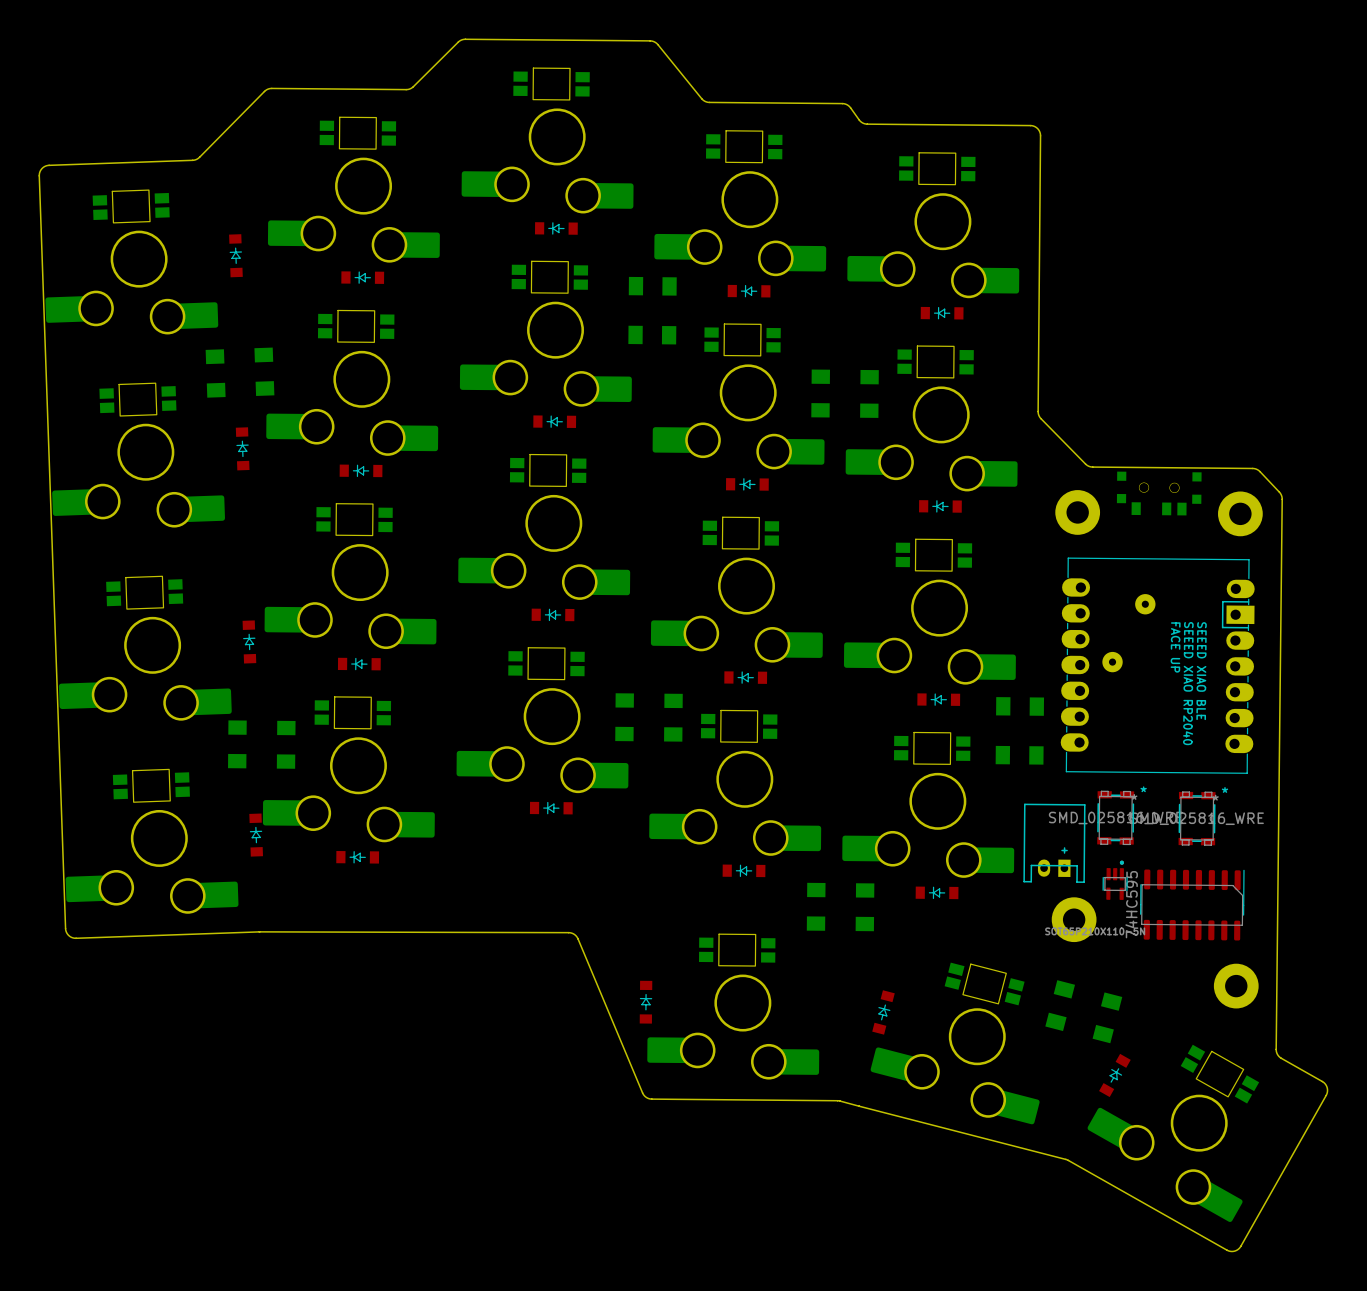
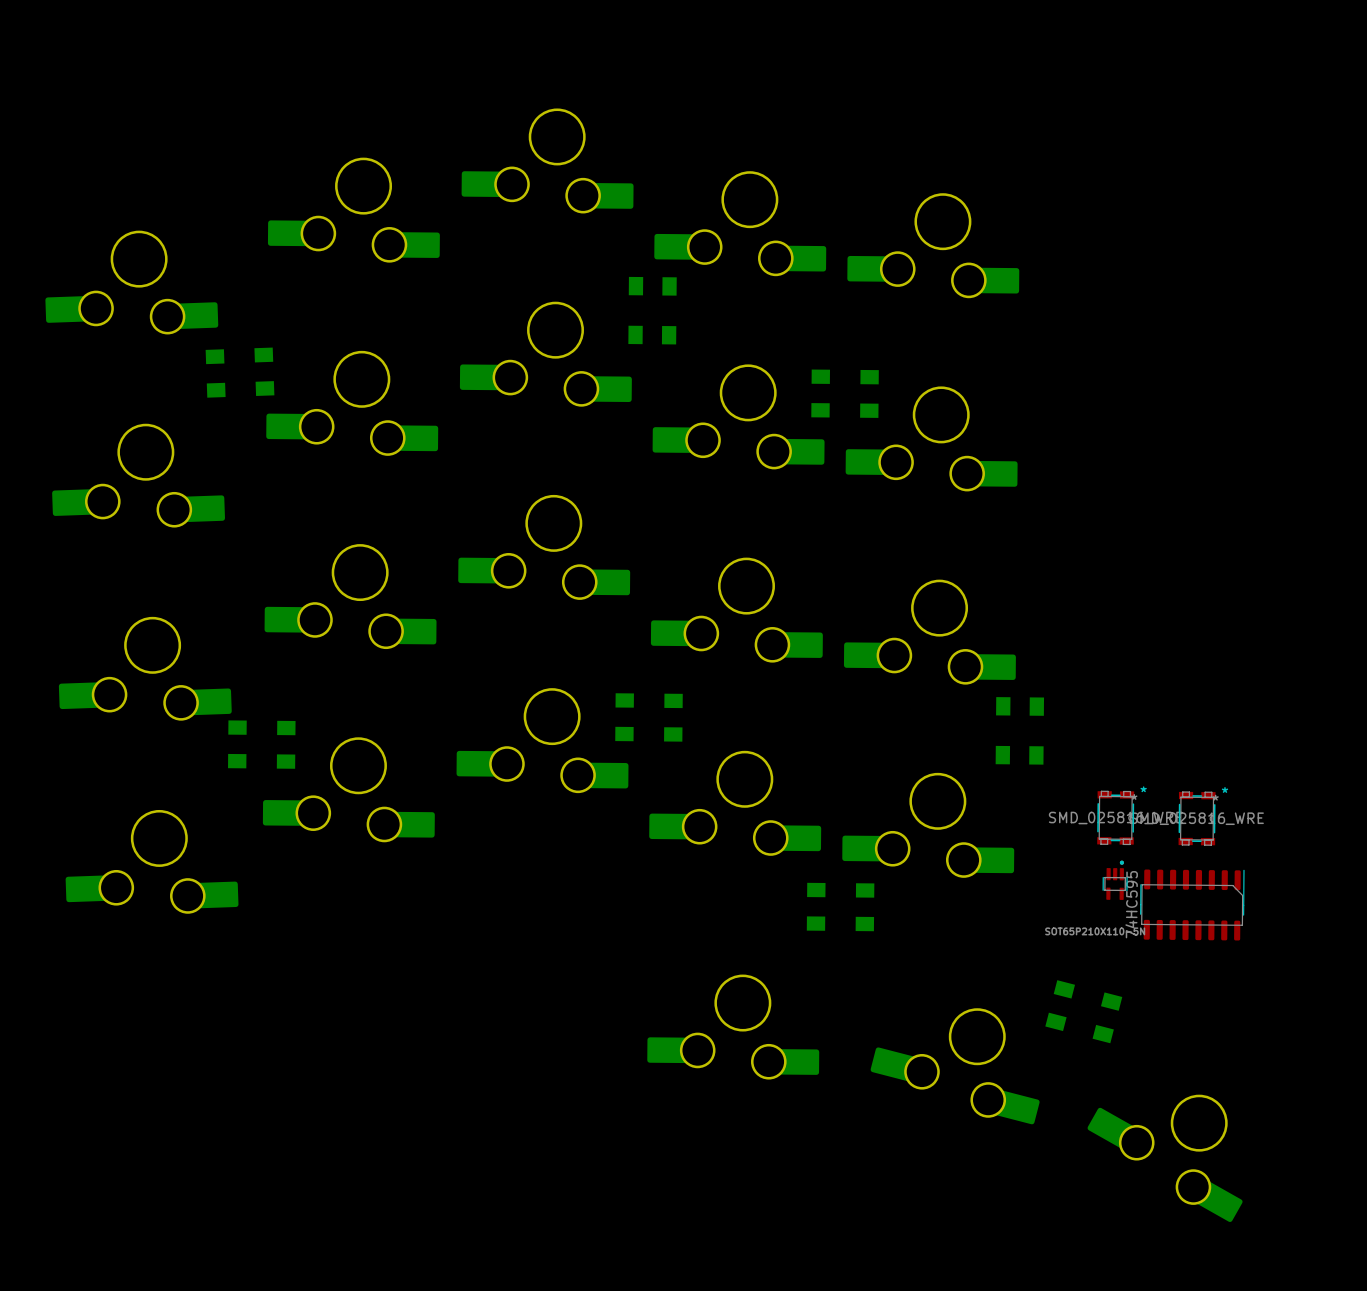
board edge: (465, 39) (651, 40) (657, 43) (701, 98) (707, 102) (843, 103) (849, 106) (860, 121) (866, 124) (1034, 126) (1039, 130) (1040, 135) (1038, 411) (1040, 417) (1089, 466) (1253, 468) (1259, 470) (1280, 493) (1282, 499) (1276, 1050) (1280, 1057) (1323, 1082) (1327, 1091) (1237, 1249) (1232, 1251) (1226, 1250) (1067, 1159) (840, 1101) (647, 1097) (642, 1092) (578, 938) (571, 932) (259, 931) (76, 938) (67, 933) (39, 171) (44, 166) (49, 165) (195, 159) (267, 89) (409, 89) (458, 41) (465, 39) -> none
part: (551, 84) -> none
part: (357, 133) -> none
part: (744, 146) -> none
part: (937, 168) -> none
part: (131, 206) -> none
part: (556, 228) -> none
part: (235, 255) -> none
part: (362, 277) -> none
part: (549, 277) -> none
part: (749, 291) -> none
part: (942, 313) -> none
part: (356, 326) -> none
part: (742, 339) -> none
part: (935, 361) -> none
part: (137, 399) -> none
part: (554, 421) -> none
part: (242, 448) -> none
part: (361, 470) -> none
part: (548, 470) -> none
part: (747, 484) -> none
part: (1159, 493) -> none
part: (940, 506) -> none
part: (1077, 512) -> none
part: (1240, 513) -> none
part: (354, 519) -> none
part: (740, 533) -> none
part: (933, 555) -> none
part: (144, 592) -> none
part: (553, 614) -> none
part: (249, 641) -> none
part: (546, 663) -> none
part: (359, 664) -> none
part: (1157, 665) -> none
part: (745, 677) -> none
part: (938, 699) -> none
part: (352, 712) -> none
part: (739, 726) -> none
part: (932, 748) -> none
part: (151, 785) -> none
part: (551, 808) -> none
part: (256, 835) -> none
part: (1054, 843) -> none
part: (357, 857) -> none
part: (744, 870) -> none
part: (937, 892) -> none
part: (1074, 919) -> none
part: (737, 950) -> none
part: (984, 983) -> none
part: (1236, 986) -> none
part: (646, 1002) -> none
part: (883, 1012) -> none
part: (1219, 1074) -> none
part: (1114, 1075) -> none

